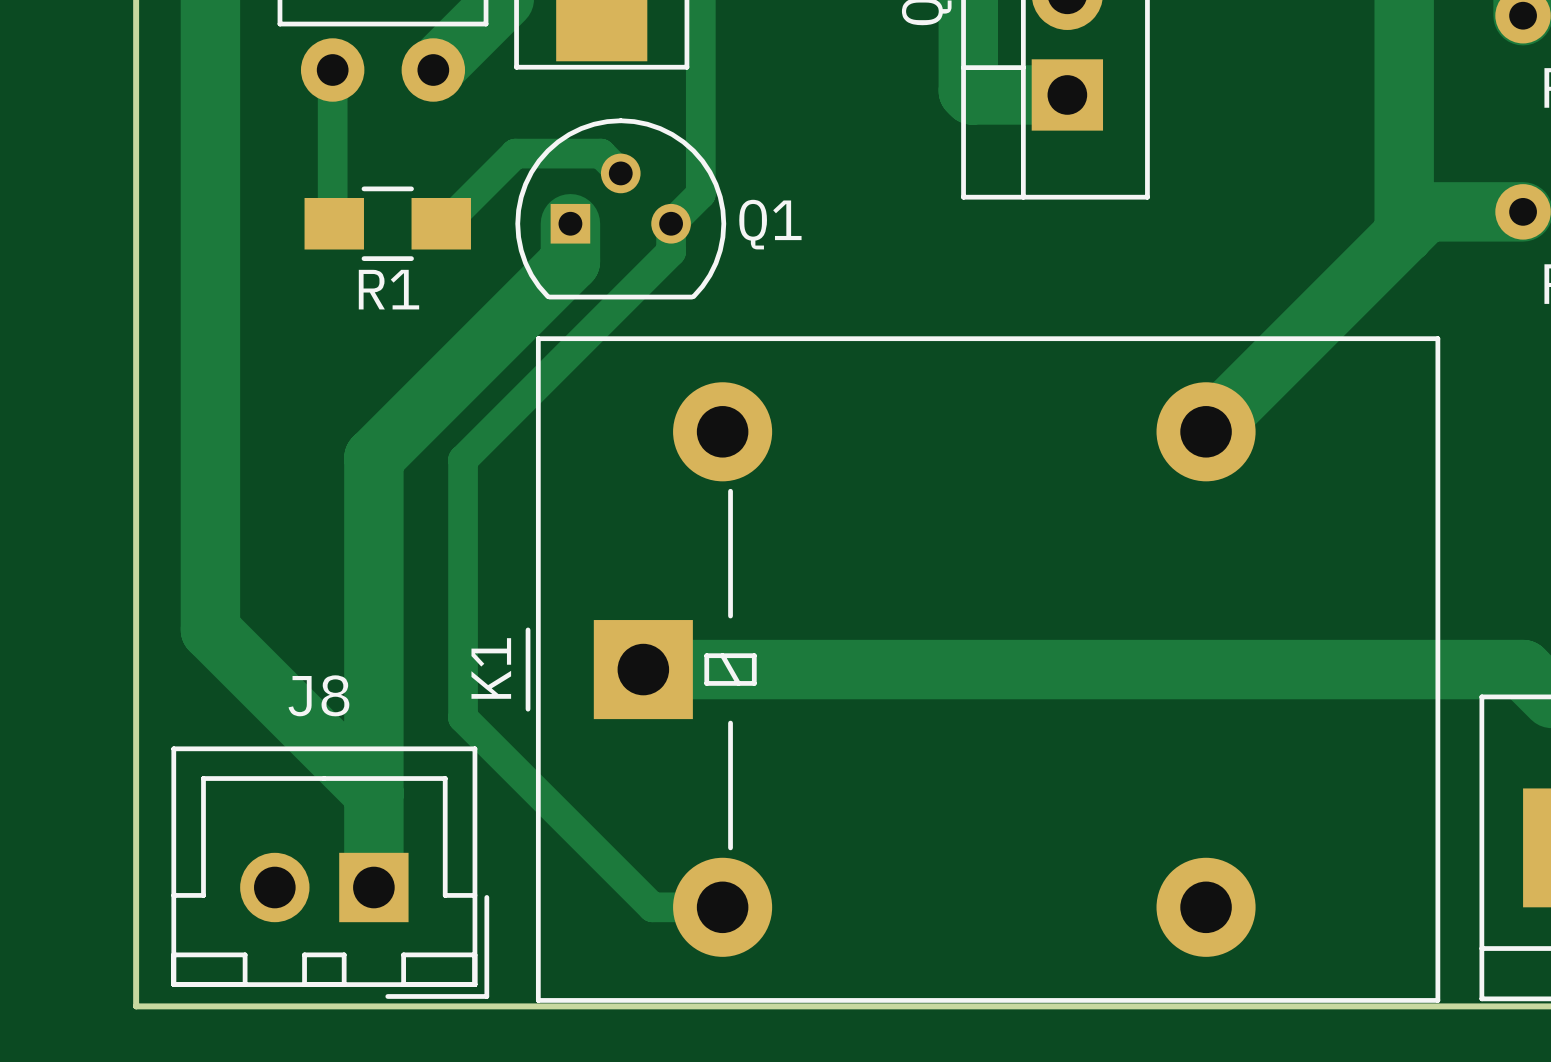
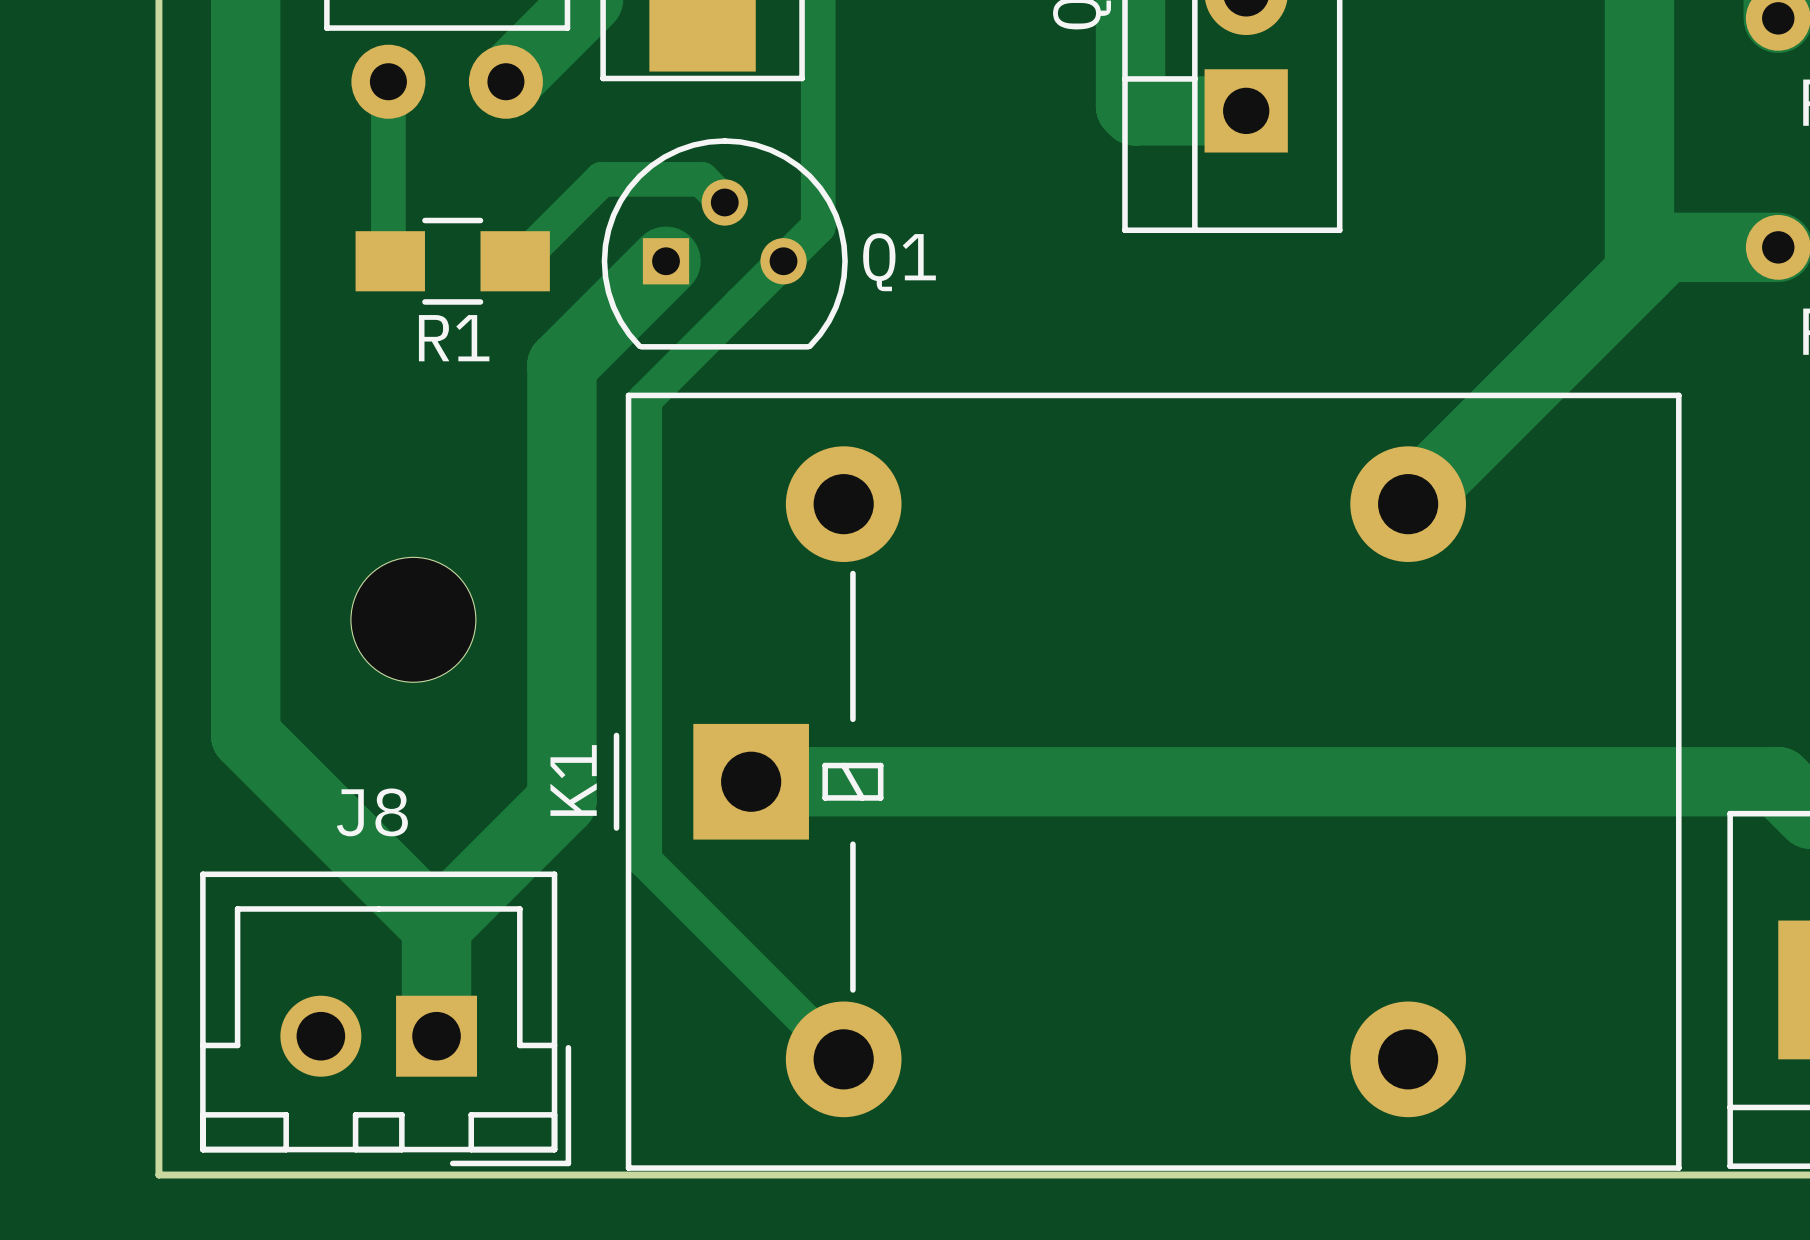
track: (570, 223) (570, 261) (373, 457) (373, 793) -> (666, 261) (561, 365) (561, 800) (436, 926)
track: (671, 223) (671, 251) (463, 459) (463, 717) (652, 907) (722, 907) -> (783, 261) (644, 400) (644, 860) (843, 1059)
part: none -> (413, 619)

